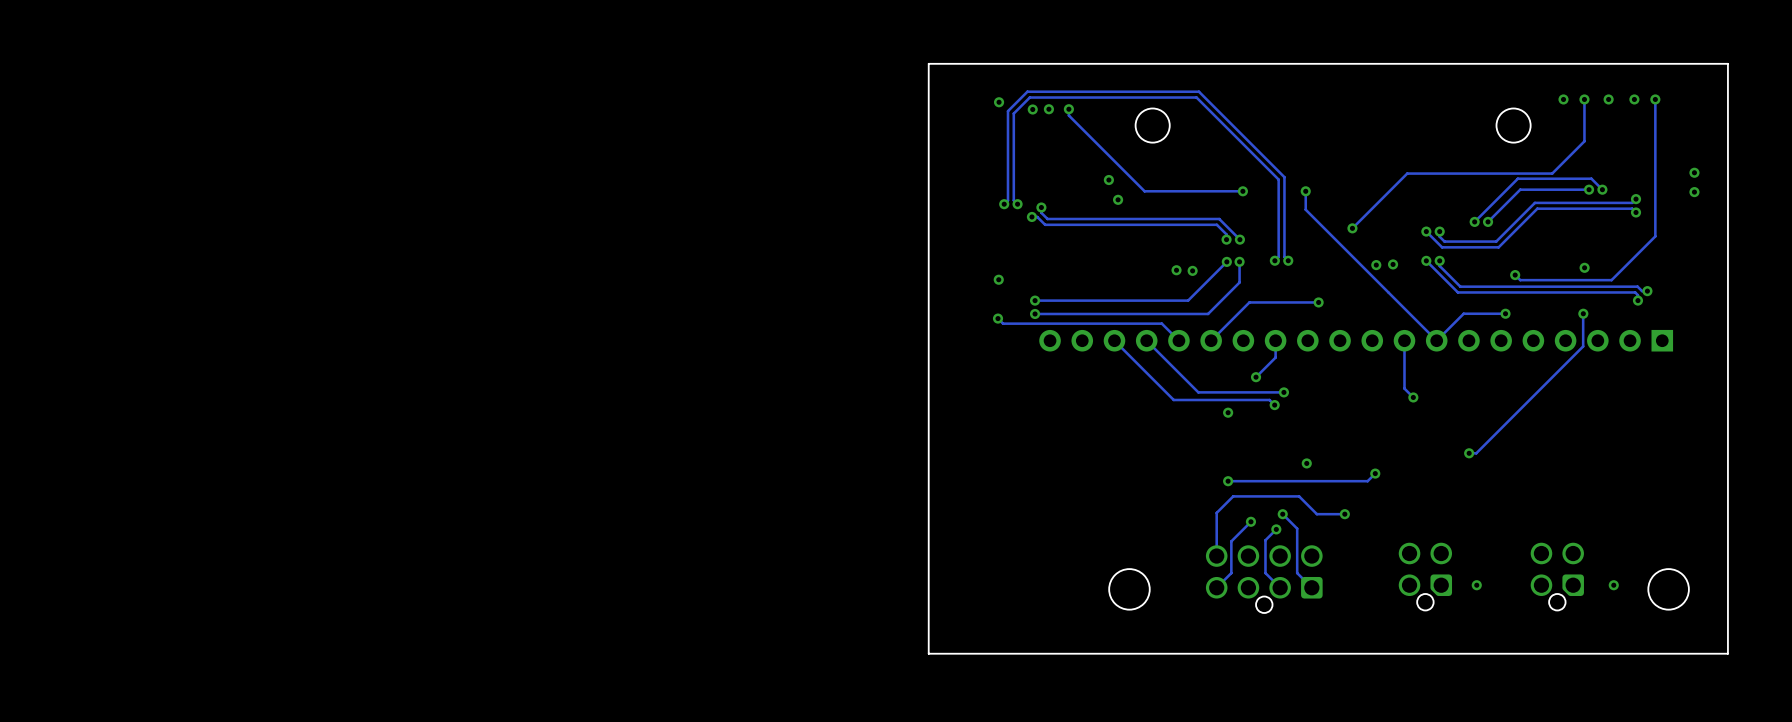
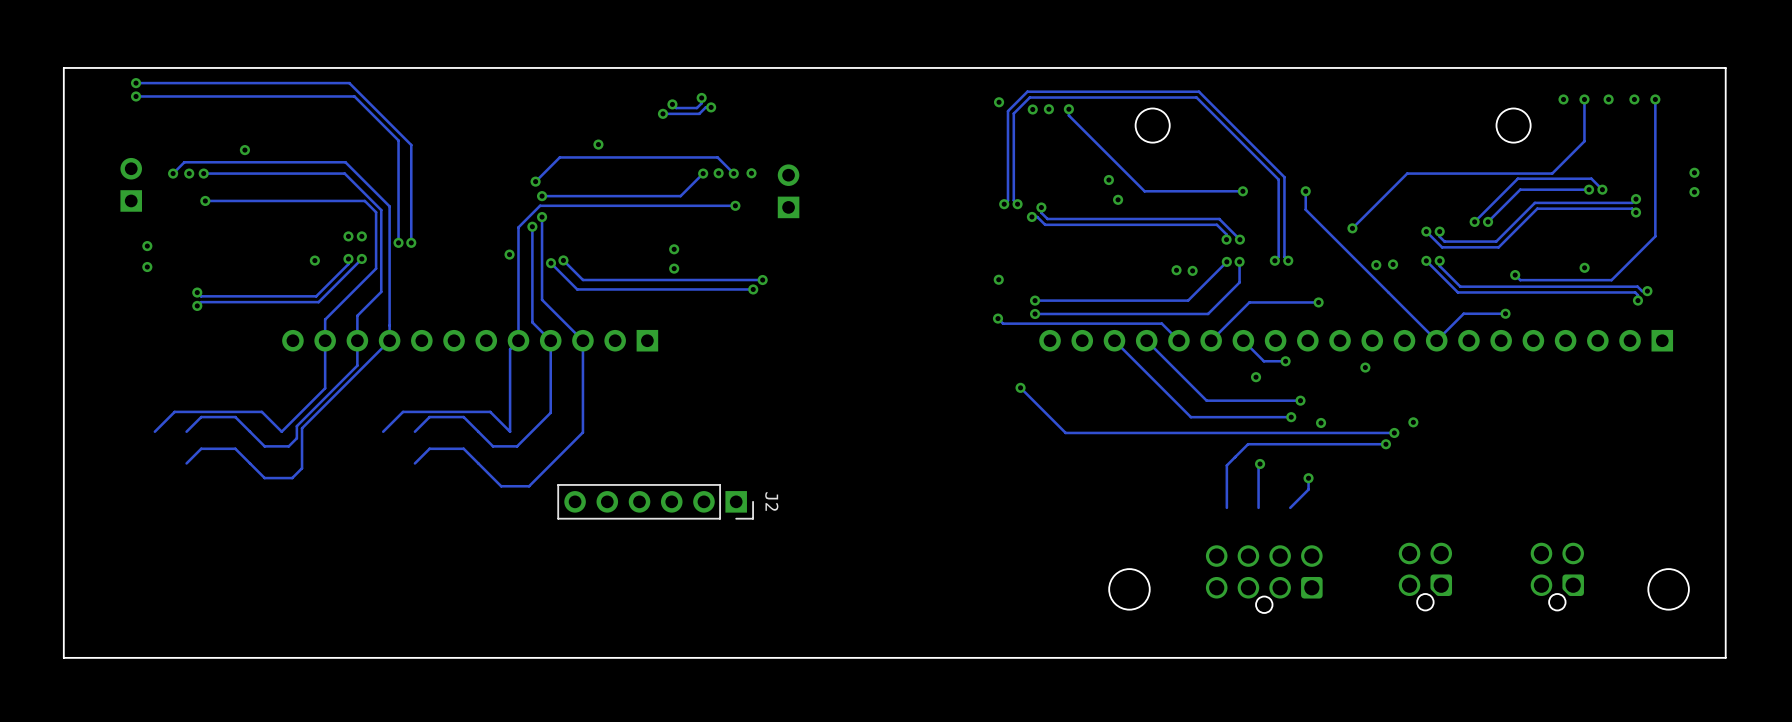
board edge: (1727, 63) (1727, 653) (928, 653) (928, 63) (1727, 63) -> none
board edge: none -> (1725, 67) (1725, 657) (63, 657) (63, 67) (1725, 67)
track: none -> (136, 83) (349, 83) (411, 145) (411, 242)
via: none -> (136, 83)
track: none -> (136, 96) (354, 96) (398, 140) (398, 242)
via: none -> (136, 96)
track: none -> (701, 97) (701, 103) (696, 108) (676, 108) (672, 104)
via: none -> (701, 97)
via: none -> (672, 104)
track: none -> (711, 107) (705, 107) (699, 113) (662, 113)
via: none -> (711, 107)
via: none -> (662, 113)
via: none -> (598, 144)
via: none -> (244, 150)
track: none -> (173, 173) (184, 162) (345, 162) (389, 206) (389, 340) (302, 428) (302, 468) (292, 478) (264, 478) (235, 448) (201, 448) (186, 463)
via: none -> (173, 173)
via: none -> (189, 173)
track: none -> (203, 173) (344, 173) (381, 210) (381, 291) (357, 315) (357, 365) (296, 426) (296, 438) (288, 446) (264, 446) (235, 417) (201, 417) (186, 431)
via: none -> (203, 173)
track: none -> (703, 173) (680, 196) (542, 196)
via: none -> (703, 173)
via: none -> (718, 173)
track: none -> (733, 173) (717, 157) (559, 157) (535, 181)
via: none -> (733, 173)
via: none -> (751, 173)
via: none -> (535, 181)
part: none -> (131, 184)
part: none -> (788, 191)
via: none -> (542, 196)
track: none -> (205, 200) (364, 200) (376, 212) (376, 268) (325, 319) (325, 388) (281, 431) (261, 411) (174, 411) (154, 431)
via: none -> (205, 200)
track: none -> (735, 205) (540, 205) (518, 227) (518, 340) (510, 349) (510, 431) (490, 411) (403, 411) (383, 431)
via: none -> (735, 205)
track: none -> (542, 217) (542, 299) (582, 340) (582, 432) (529, 486) (501, 486) (463, 448) (429, 448) (414, 463)
via: none -> (542, 217)
track: none -> (532, 226) (532, 322) (550, 340) (550, 412) (517, 446) (493, 446) (463, 417) (429, 417) (414, 431)
via: none -> (532, 226)
via: none -> (348, 236)
via: none -> (361, 236)
via: none -> (398, 242)
via: none -> (411, 242)
via: none -> (147, 246)
via: none -> (674, 249)
via: none -> (509, 254)
track: none -> (348, 258) (348, 264) (316, 296) (201, 296) (197, 292)
via: none -> (348, 258)
track: none -> (361, 258) (318, 302) (201, 302) (197, 305)
via: none -> (361, 258)
via: none -> (314, 260)
track: none -> (563, 260) (583, 280) (762, 280)
via: none -> (563, 260)
track: none -> (550, 263) (577, 289) (753, 289)
via: none -> (550, 263)
via: none -> (147, 267)
via: none -> (674, 268)
via: none -> (762, 280)
via: none -> (753, 289)
via: none -> (197, 292)
via: none -> (197, 305)
track: (1583, 313) (1583, 346) (1476, 453) (1469, 453) -> none
via: (1583, 313) -> none
part: none -> (470, 340)
track: none -> (1243, 340) (1263, 361) (1285, 361)
track: (1275, 340) (1275, 357) (1256, 377) -> none
track: (1404, 340) (1404, 388) (1413, 397) -> none
via: none -> (1285, 361)
via: none -> (1365, 367)
track: none -> (1020, 387) (1065, 432) (1394, 432)
via: none -> (1020, 387)
track: (1283, 392) (1198, 392) -> (1300, 400) (1206, 400) (1198, 392)
via: (1283, 392) -> none
via: (1413, 397) -> none
track: (1173, 400) (1269, 400) (1274, 405) -> (1173, 400) (1190, 417) (1291, 417)
via: none -> (1300, 400)
via: (1274, 405) -> none
via: (1228, 412) -> none
via: none -> (1291, 417)
via: none -> (1321, 422)
via: none -> (1413, 422)
via: none -> (1394, 432)
track: none -> (1385, 444) (1248, 444) (1226, 465) (1226, 507)
via: none -> (1385, 444)
via: (1469, 453) -> none
track: none -> (1260, 463) (1258, 507)
via: none -> (1260, 463)
via position: (1306, 463) -> (1308, 478)
track: (1375, 473) (1367, 481) (1228, 481) -> none
via: (1375, 473) -> none
track: none -> (1308, 478) (1308, 489) (1290, 507)
via: (1228, 481) -> none
J2: none -> (655, 501)
track: (1282, 514) (1297, 528) (1297, 573) (1311, 587) -> none
via: (1282, 514) -> none
track: (1344, 514) (1316, 514) (1299, 496) (1233, 496) (1216, 512) (1216, 556) -> none
via: (1344, 514) -> none
track: (1250, 521) (1231, 541) (1231, 573) (1216, 587) -> none
via: (1250, 521) -> none
track: (1276, 529) (1265, 540) (1265, 573) (1280, 587) -> none
via: (1276, 529) -> none
via: (1476, 585) -> none
via: (1613, 585) -> none

